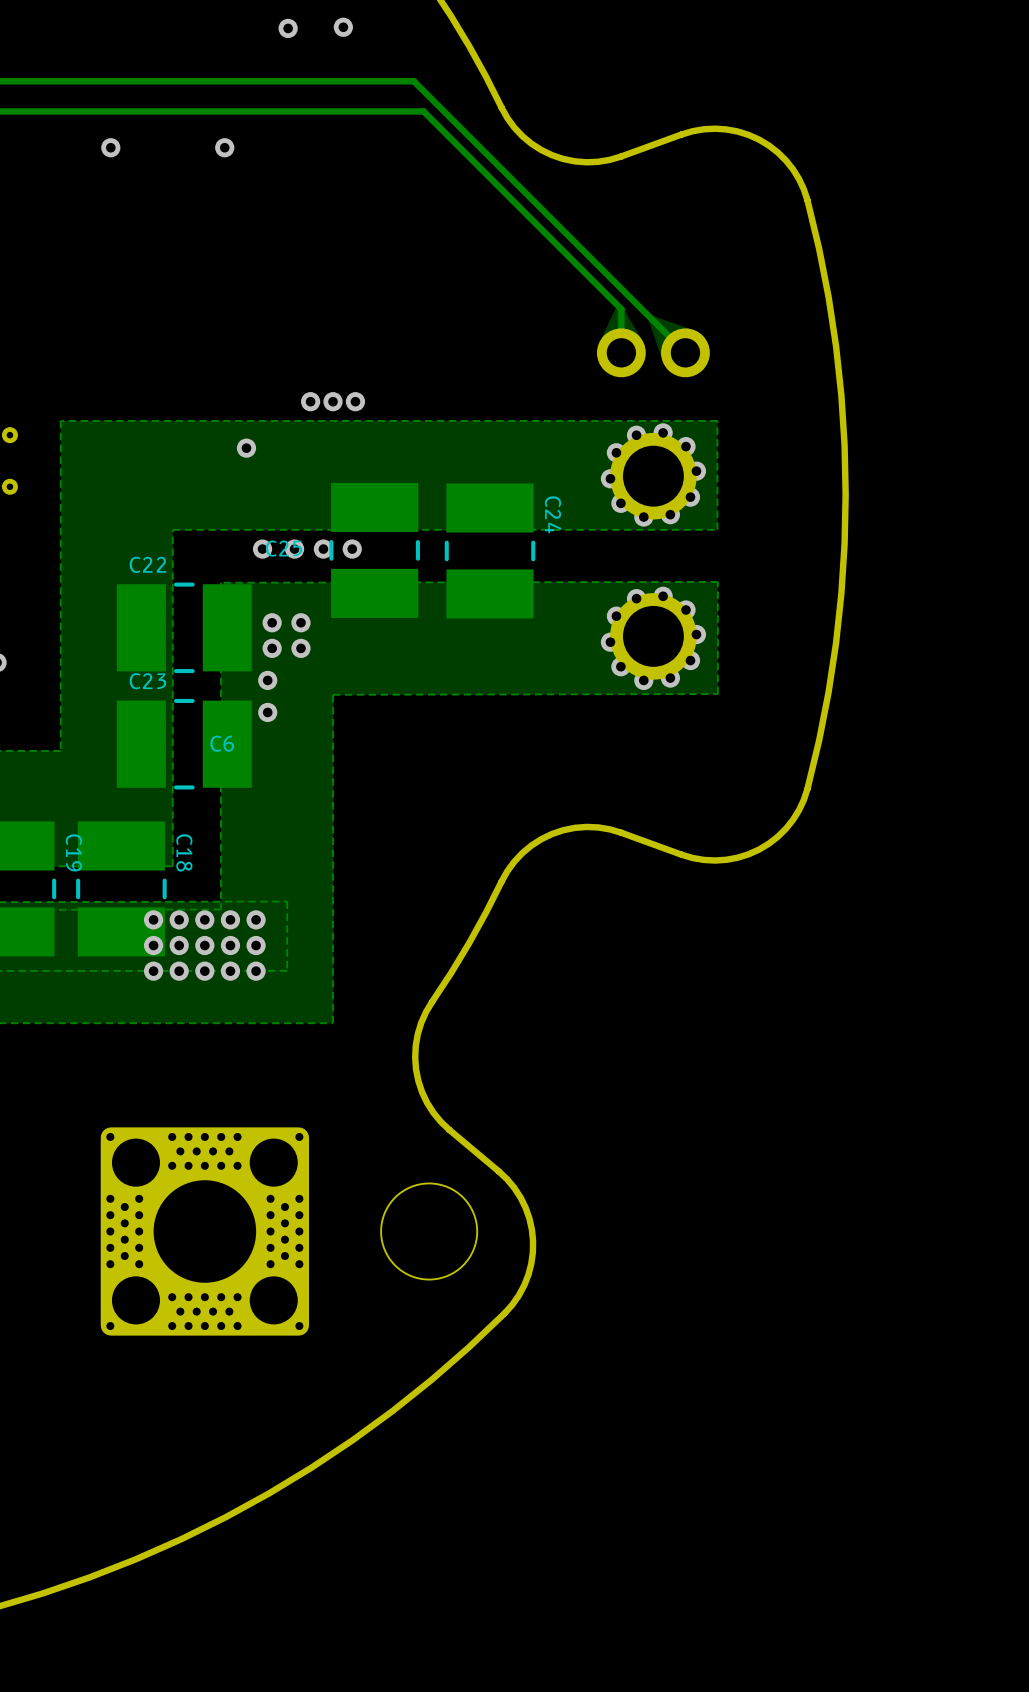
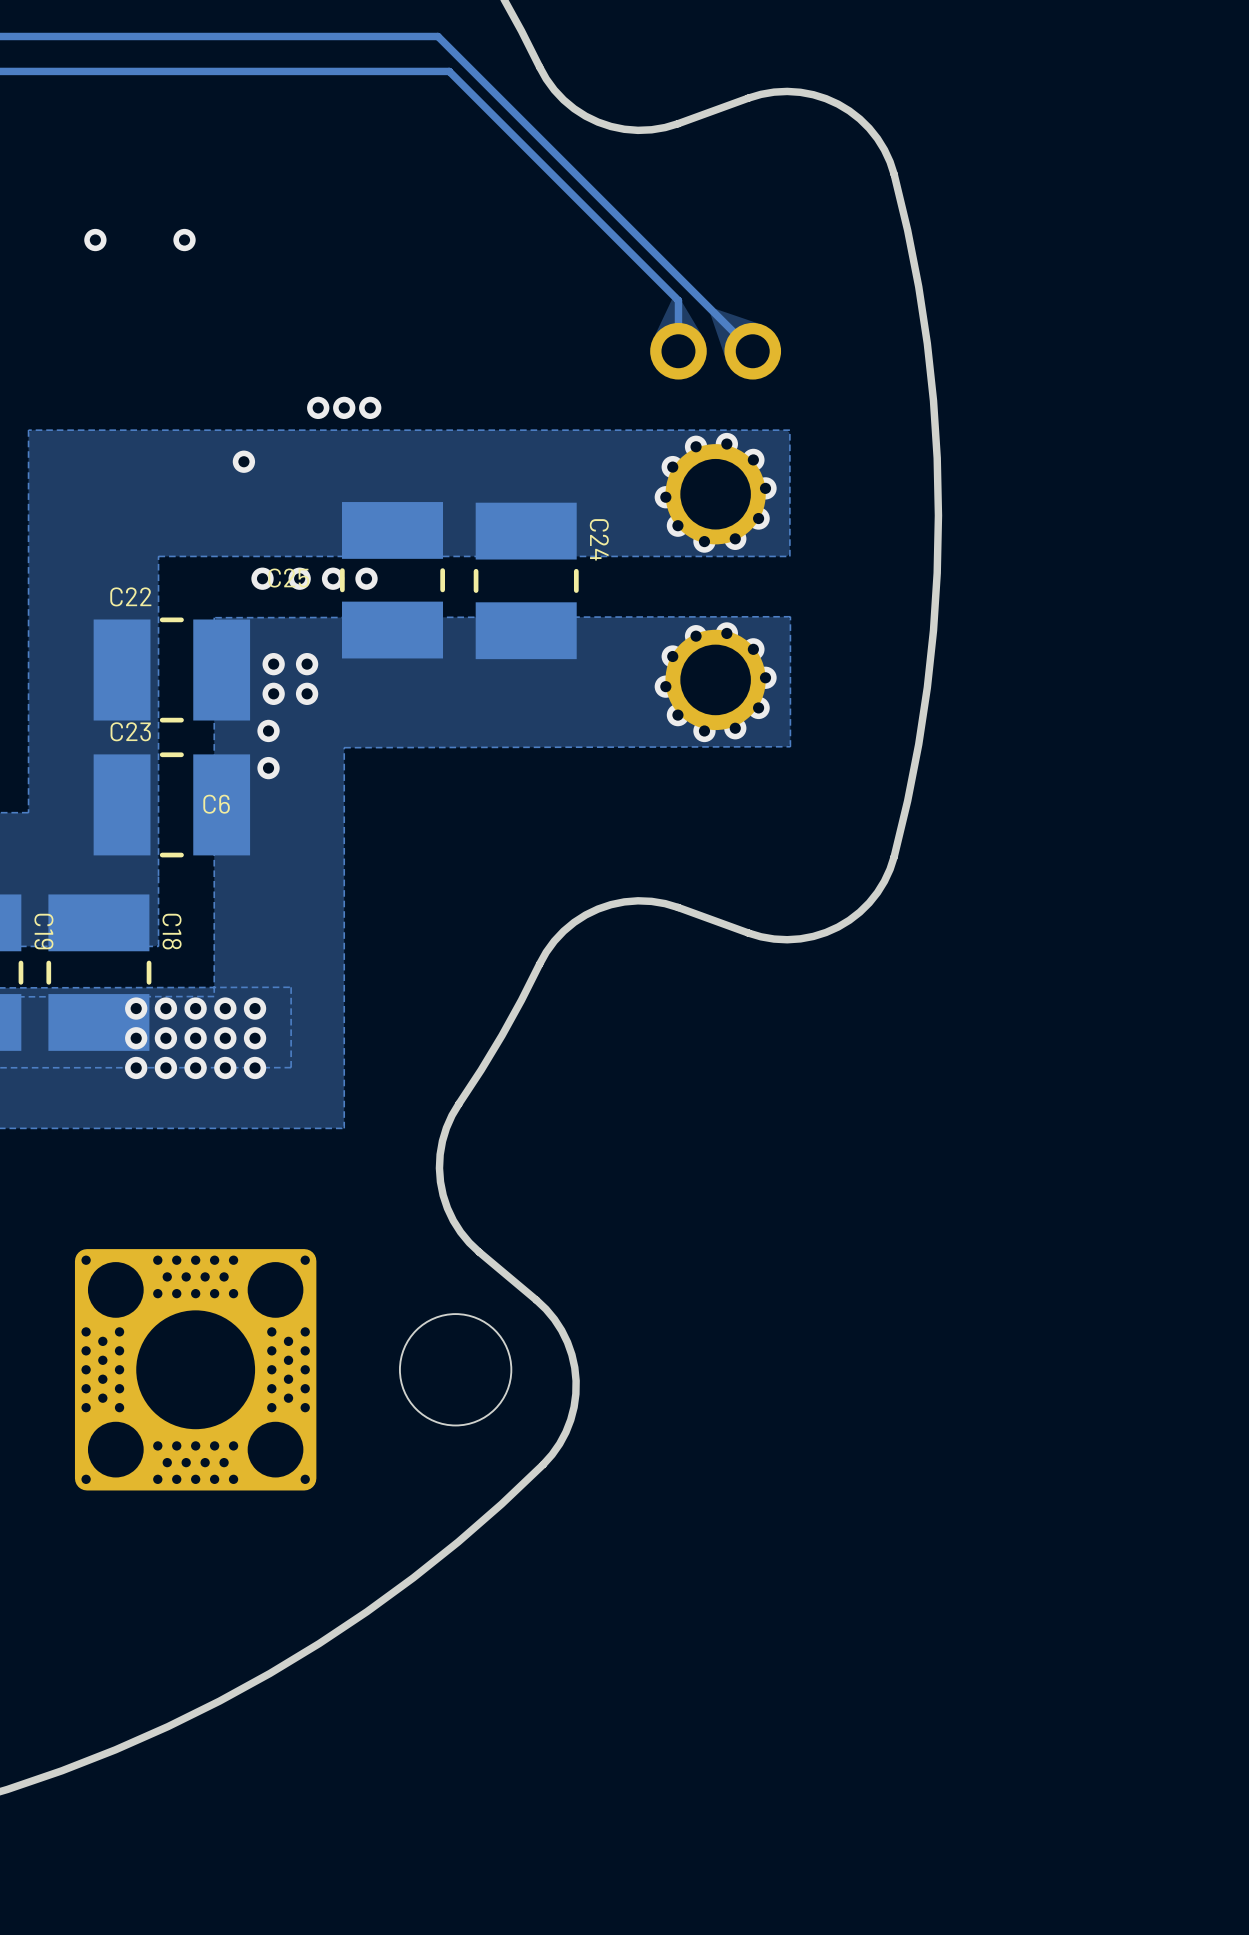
via: (110, 147) -> none
via: (224, 147) -> none
via: none -> (95, 240)
via: none -> (184, 240)

